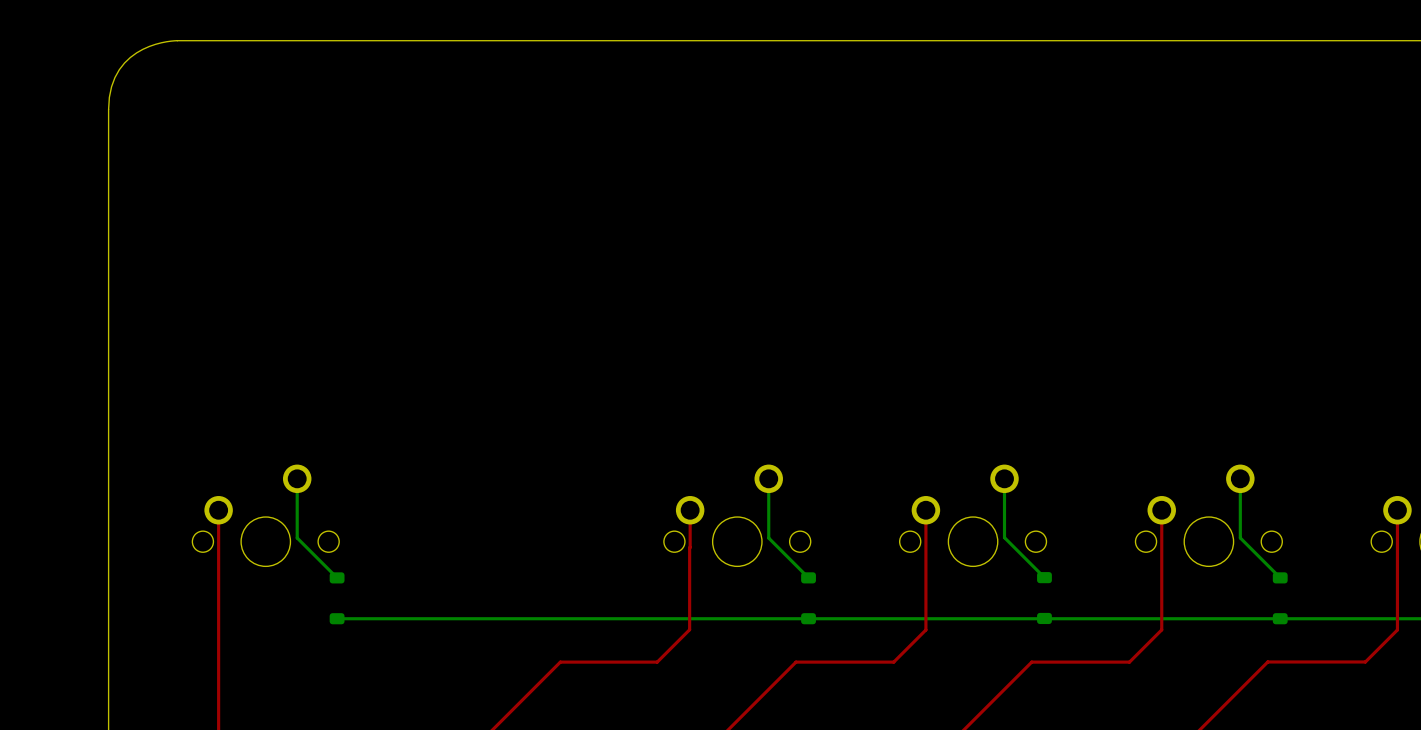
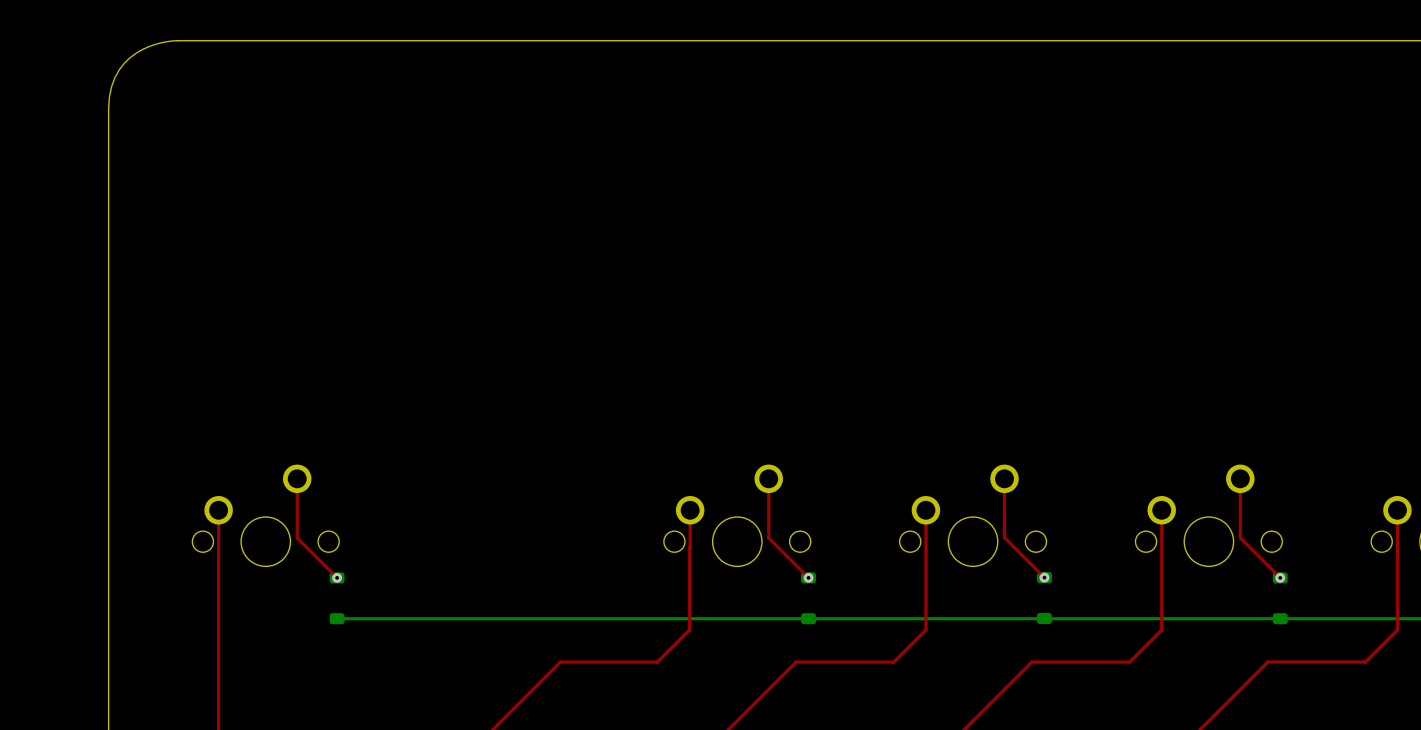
bottom track: (297, 478) (297, 538) (337, 577) -> none
top track: none -> (297, 478) (297, 538) (337, 577)
bottom track: (768, 478) (768, 538) (808, 577) -> none
top track: none -> (768, 478) (768, 538) (808, 577)
bottom track: (1004, 478) (1004, 537) (1044, 577) -> none
top track: none -> (1004, 478) (1004, 537) (1044, 577)
bottom track: (1240, 478) (1240, 537) (1280, 577) -> none
top track: none -> (1240, 478) (1240, 537) (1280, 577)
via: none -> (337, 577)
via: none -> (808, 577)
via: none -> (1044, 577)
via: none -> (1280, 577)

